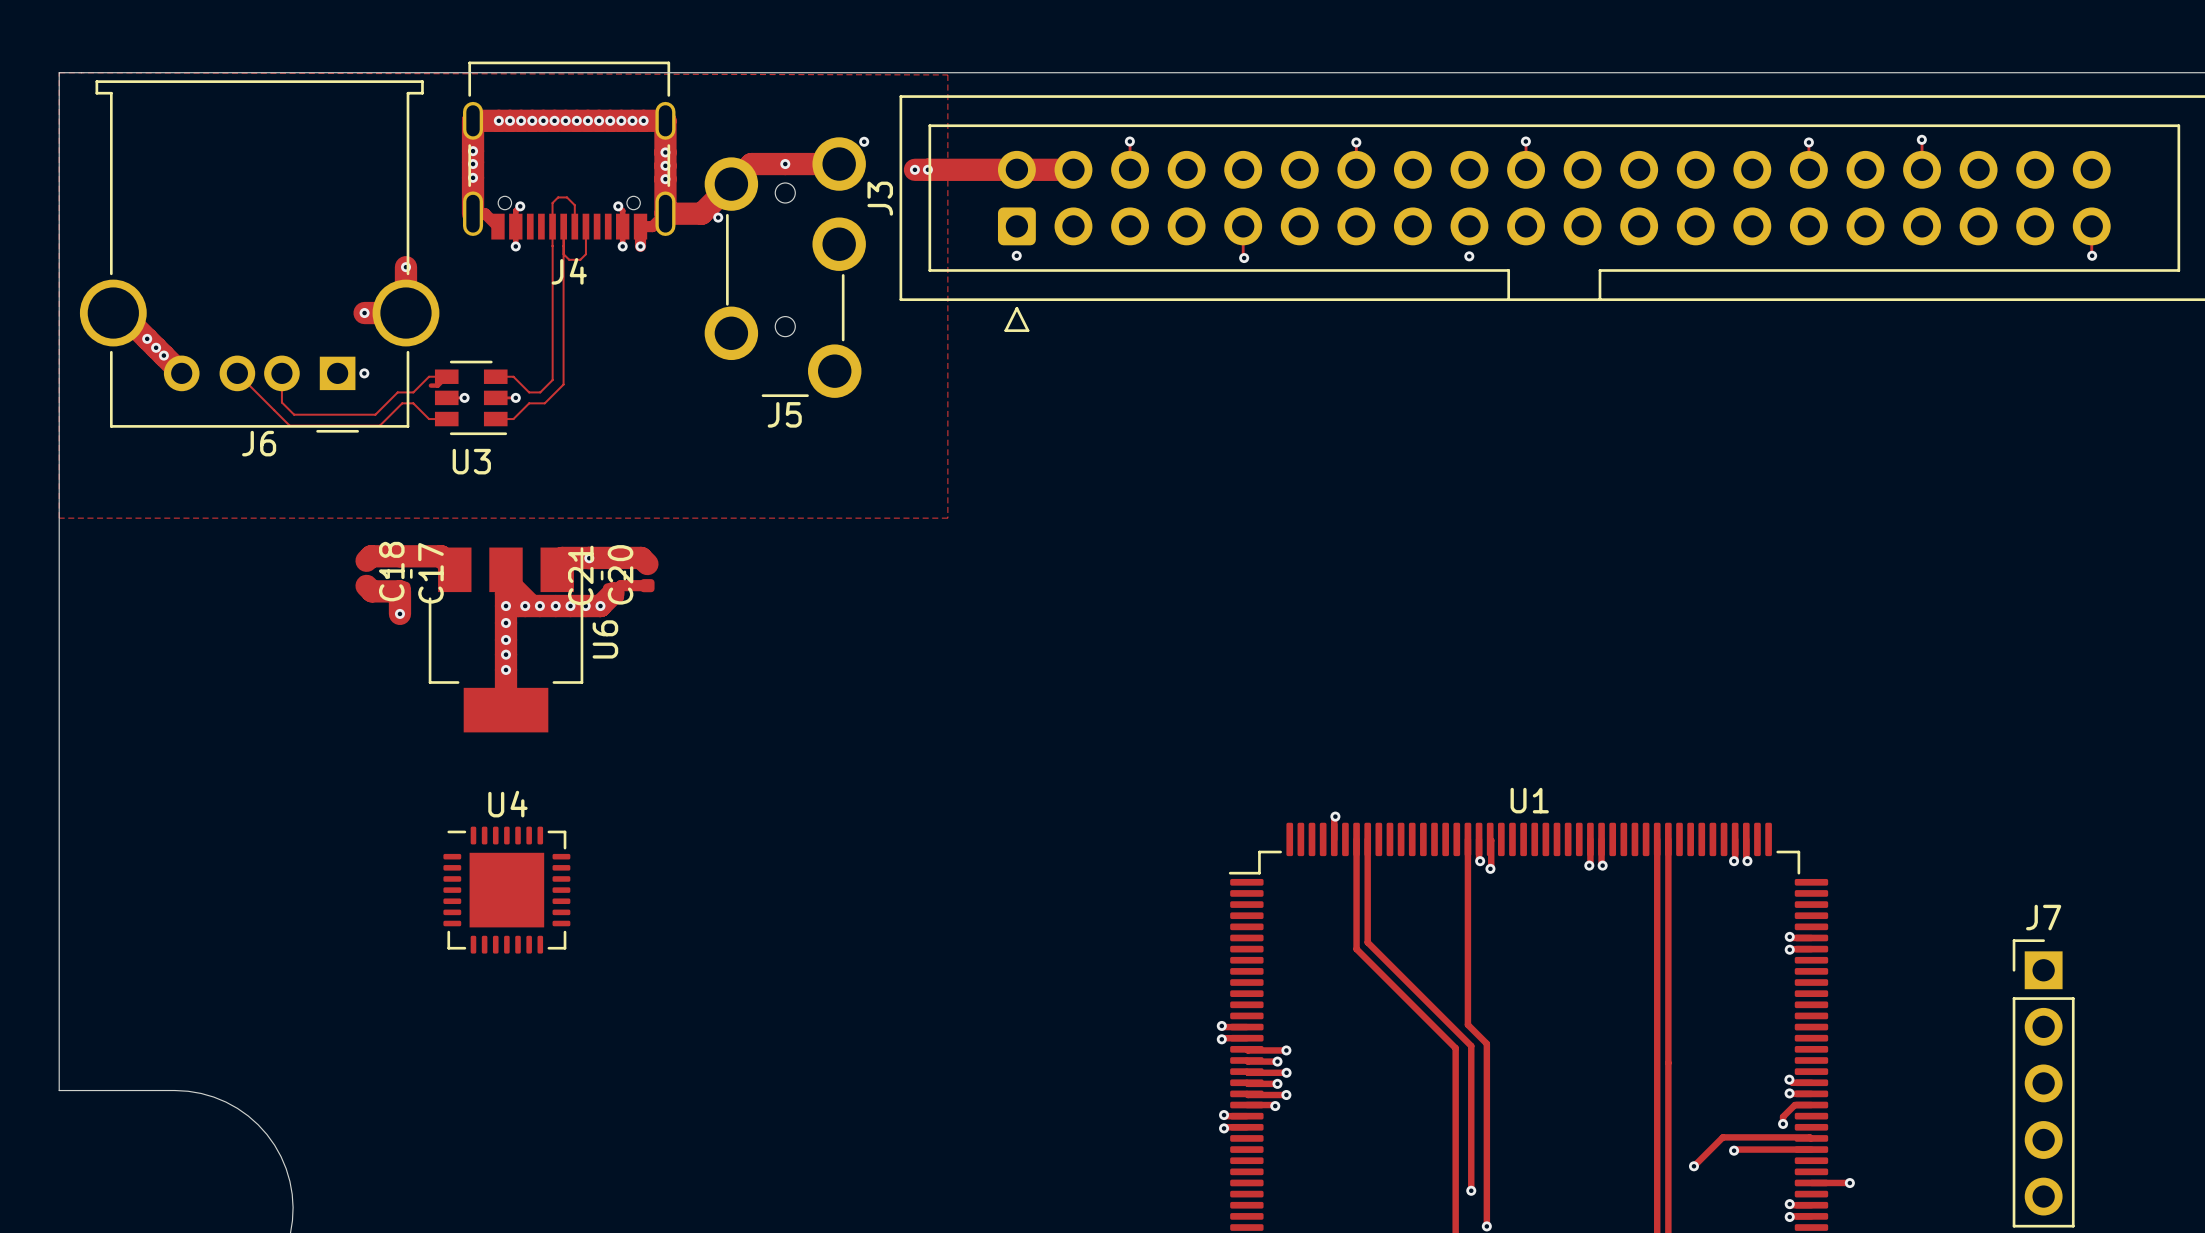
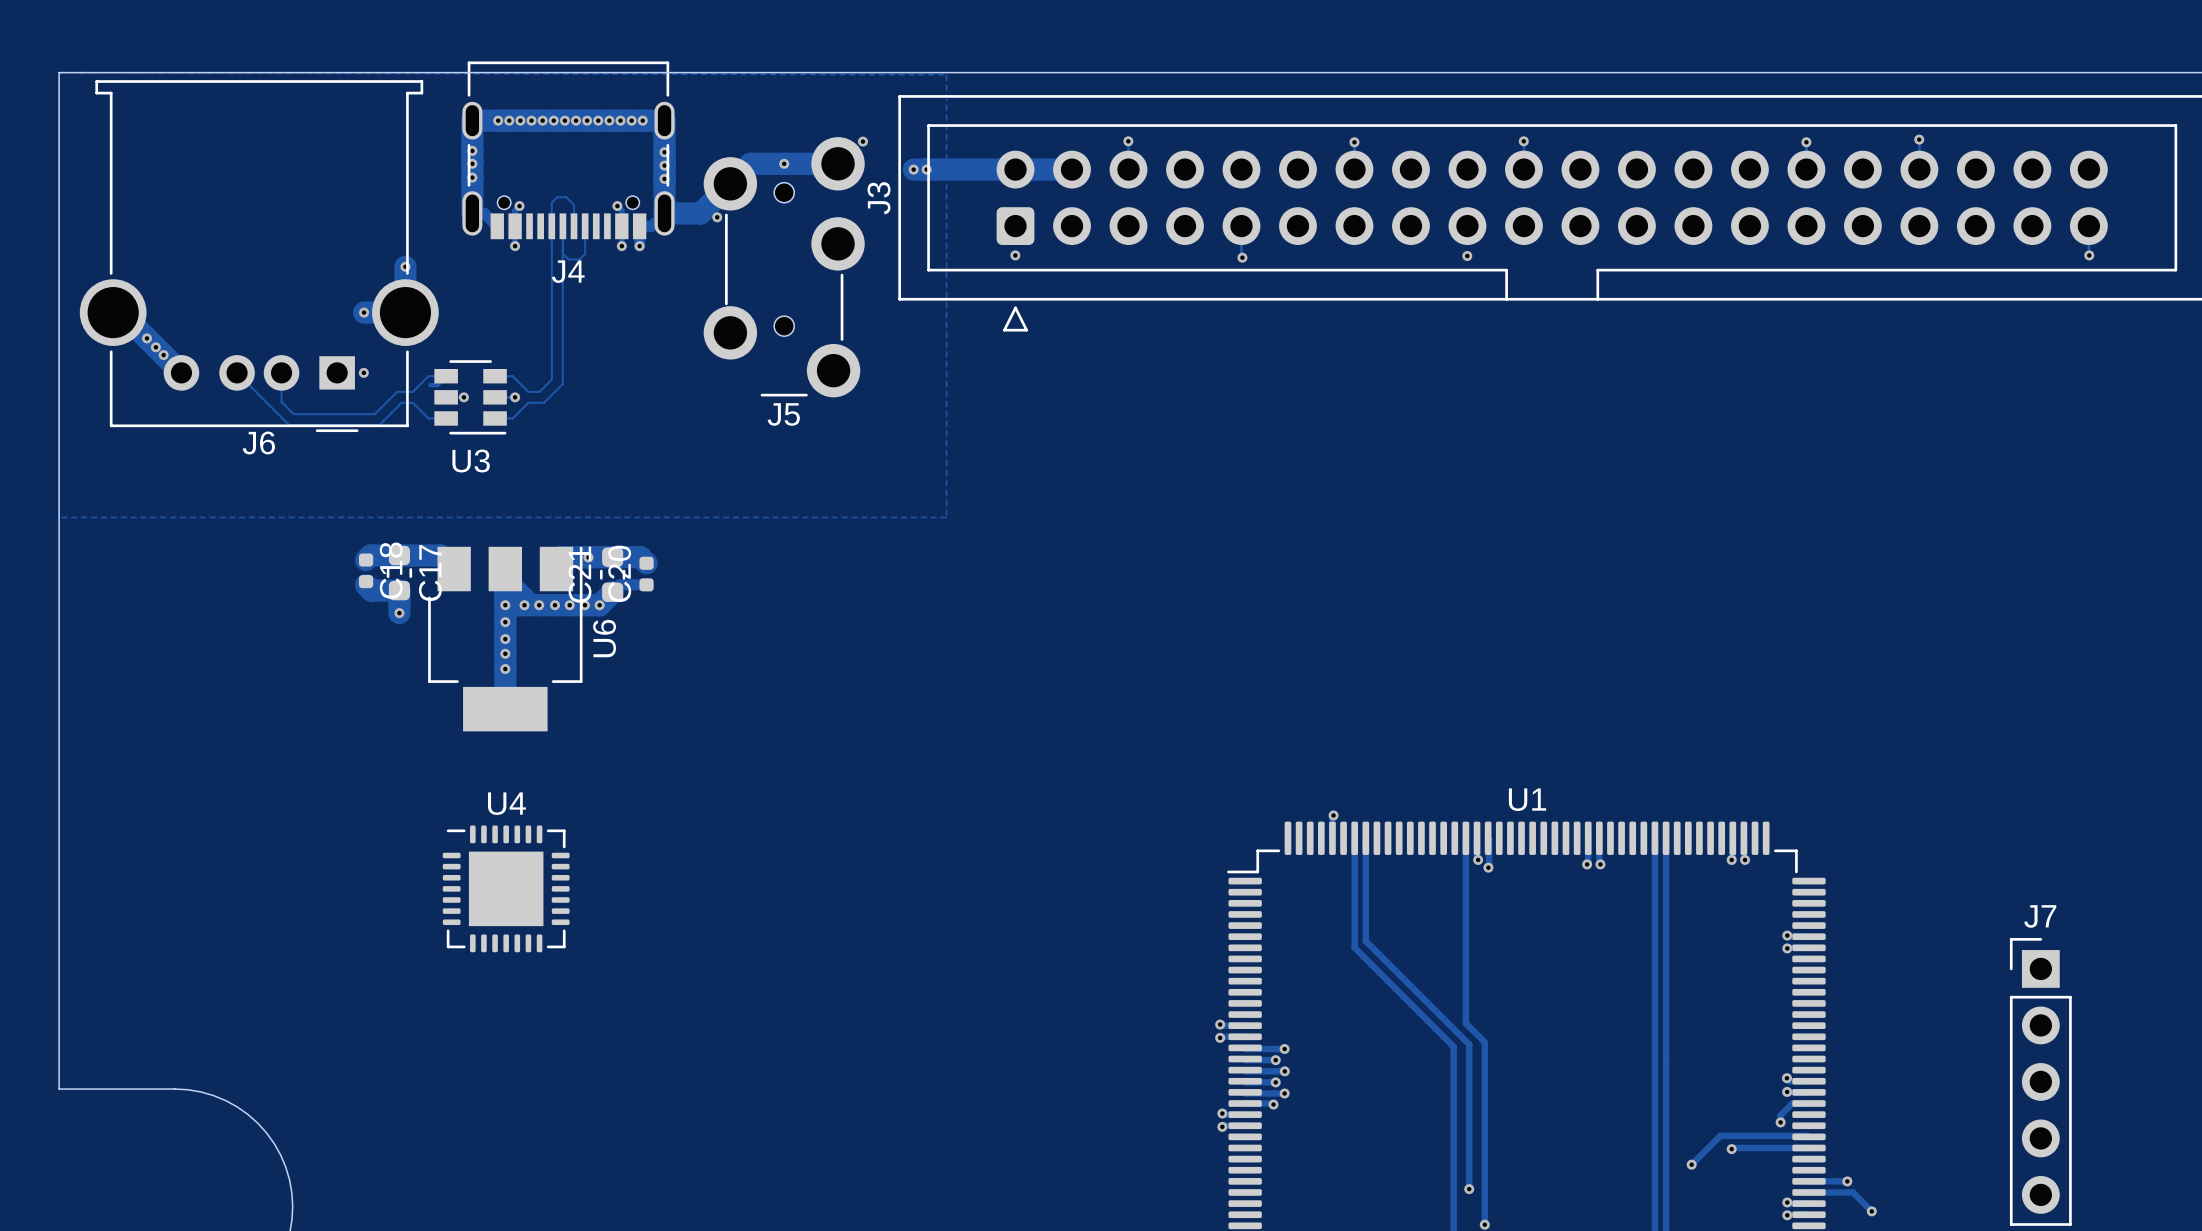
track: none -> (1808, 1192) (1852, 1192) (1871, 1211)
via: none -> (1871, 1211)

